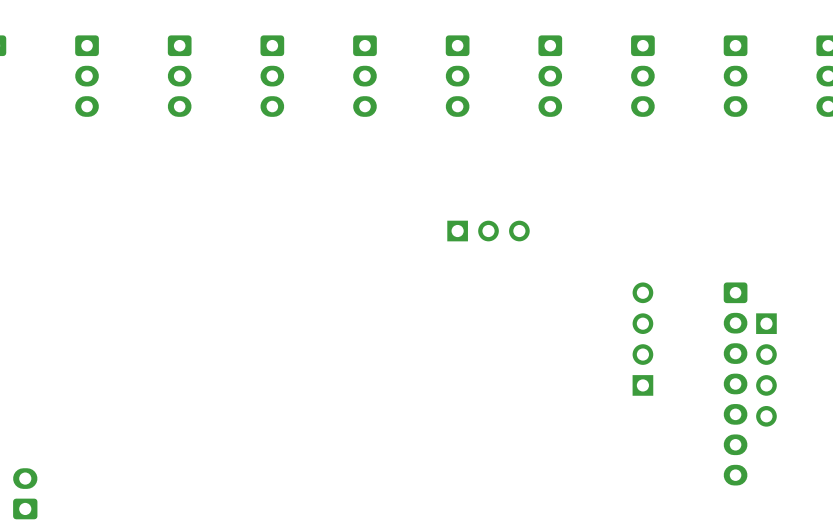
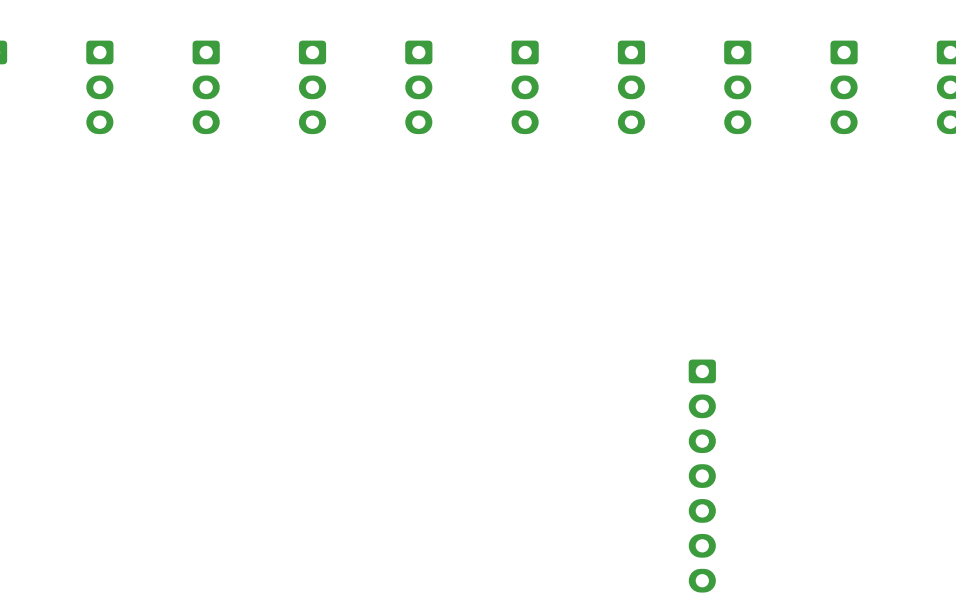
part: (488, 231) -> none
part: (642, 339) -> none
part: (766, 369) -> none
part position: (735, 383) -> (702, 476)
part: (25, 493) -> none

